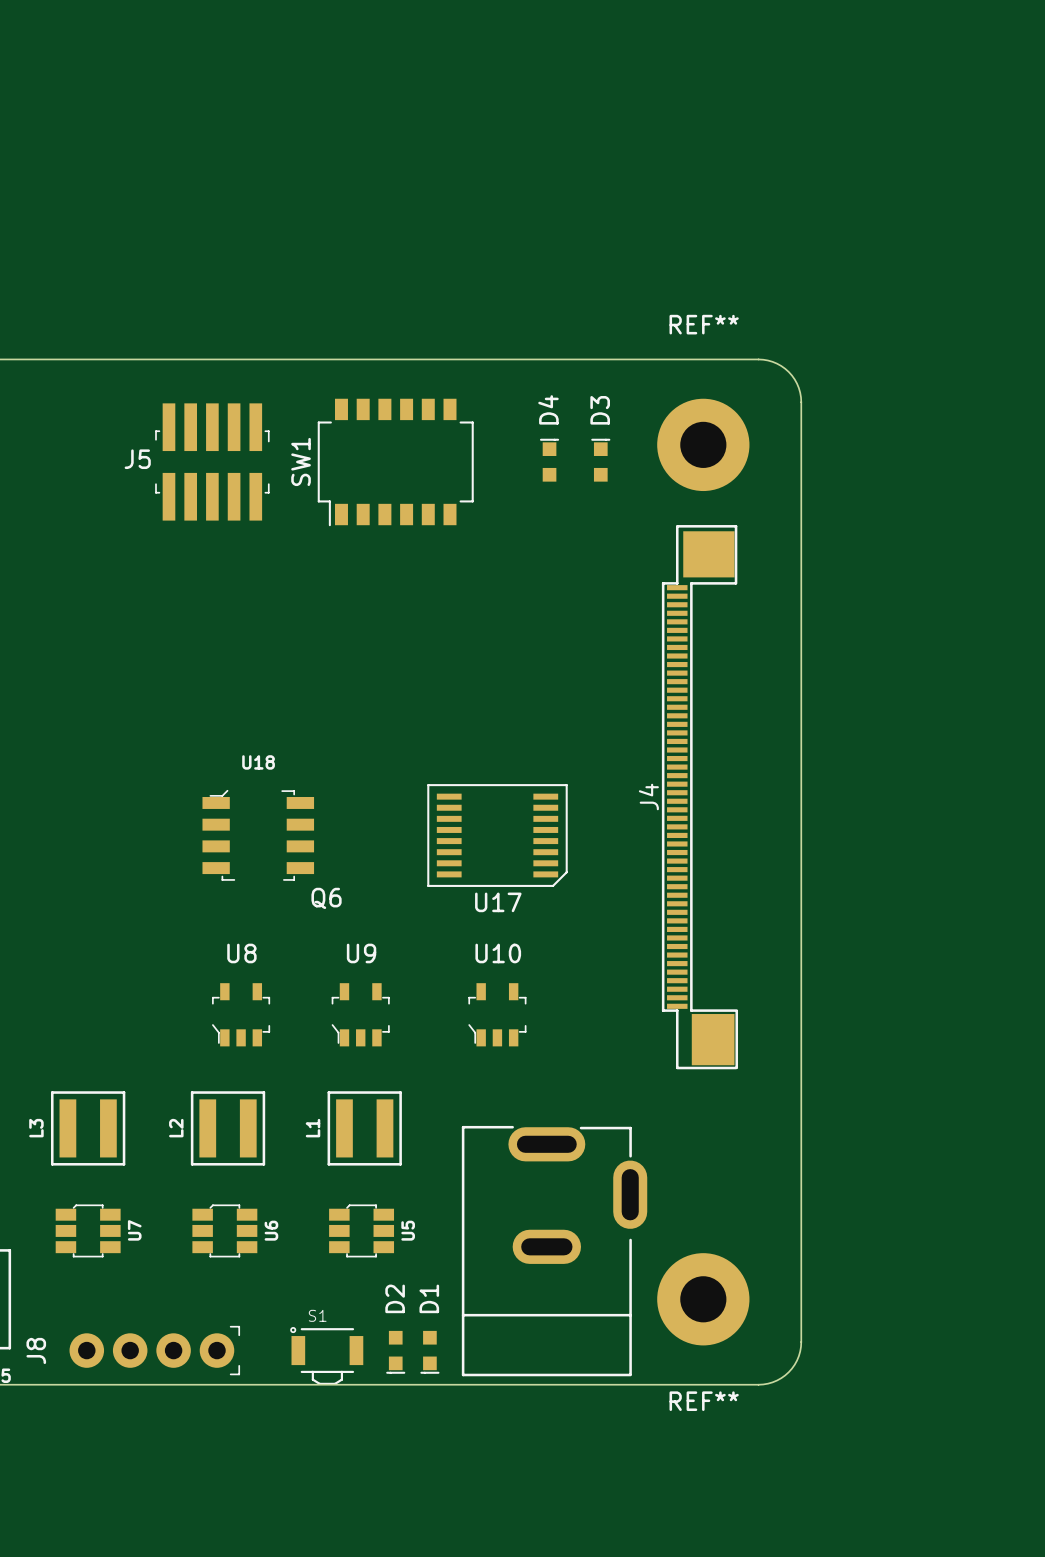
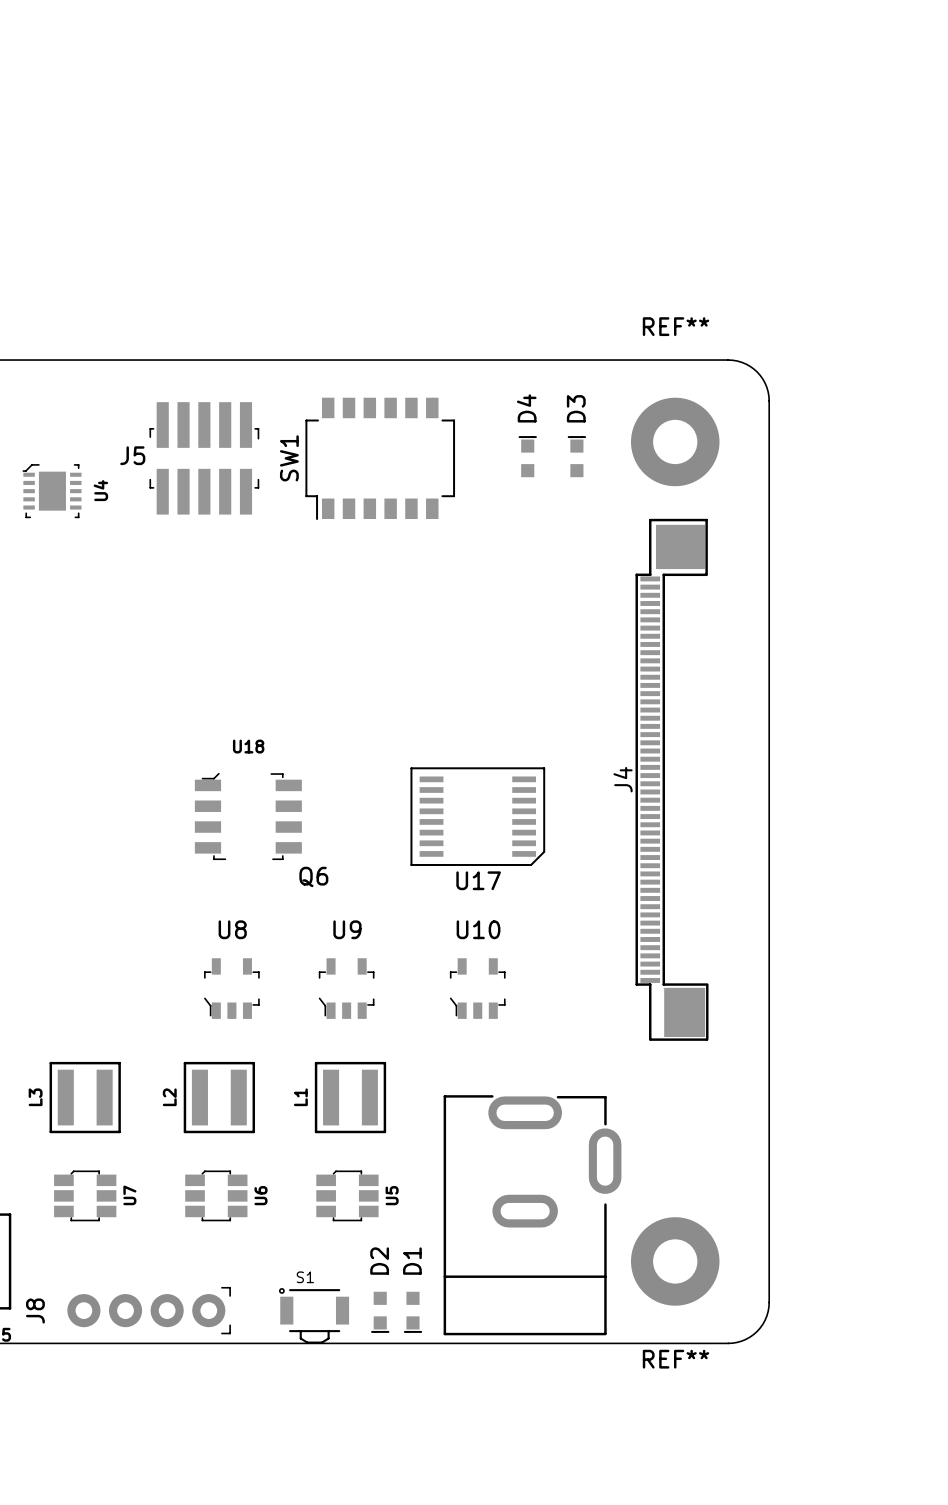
U4: none -> (52, 491)

